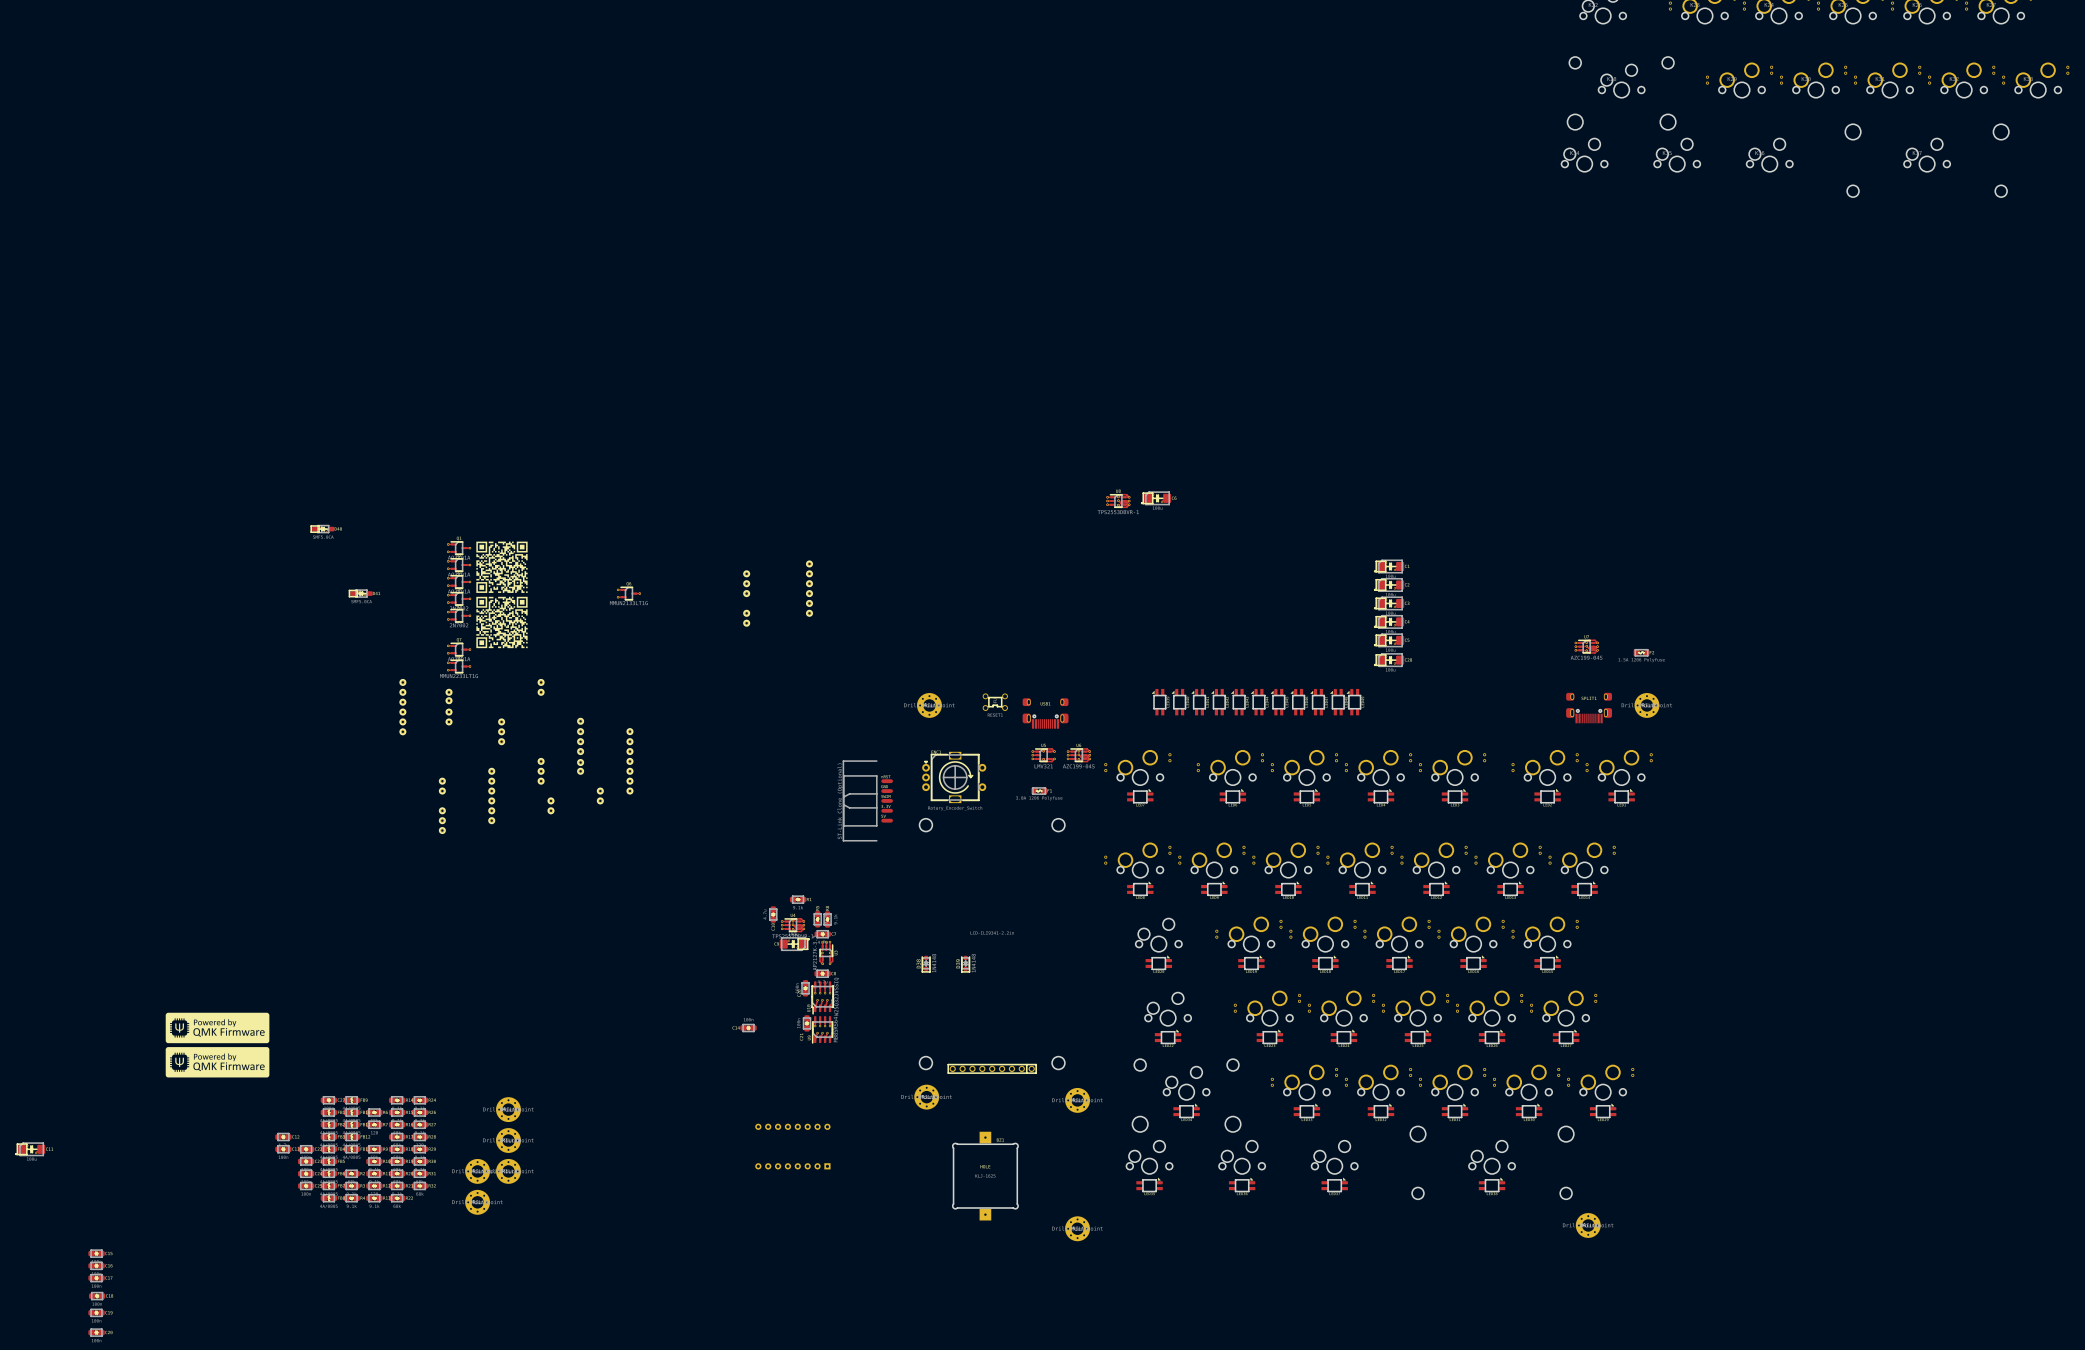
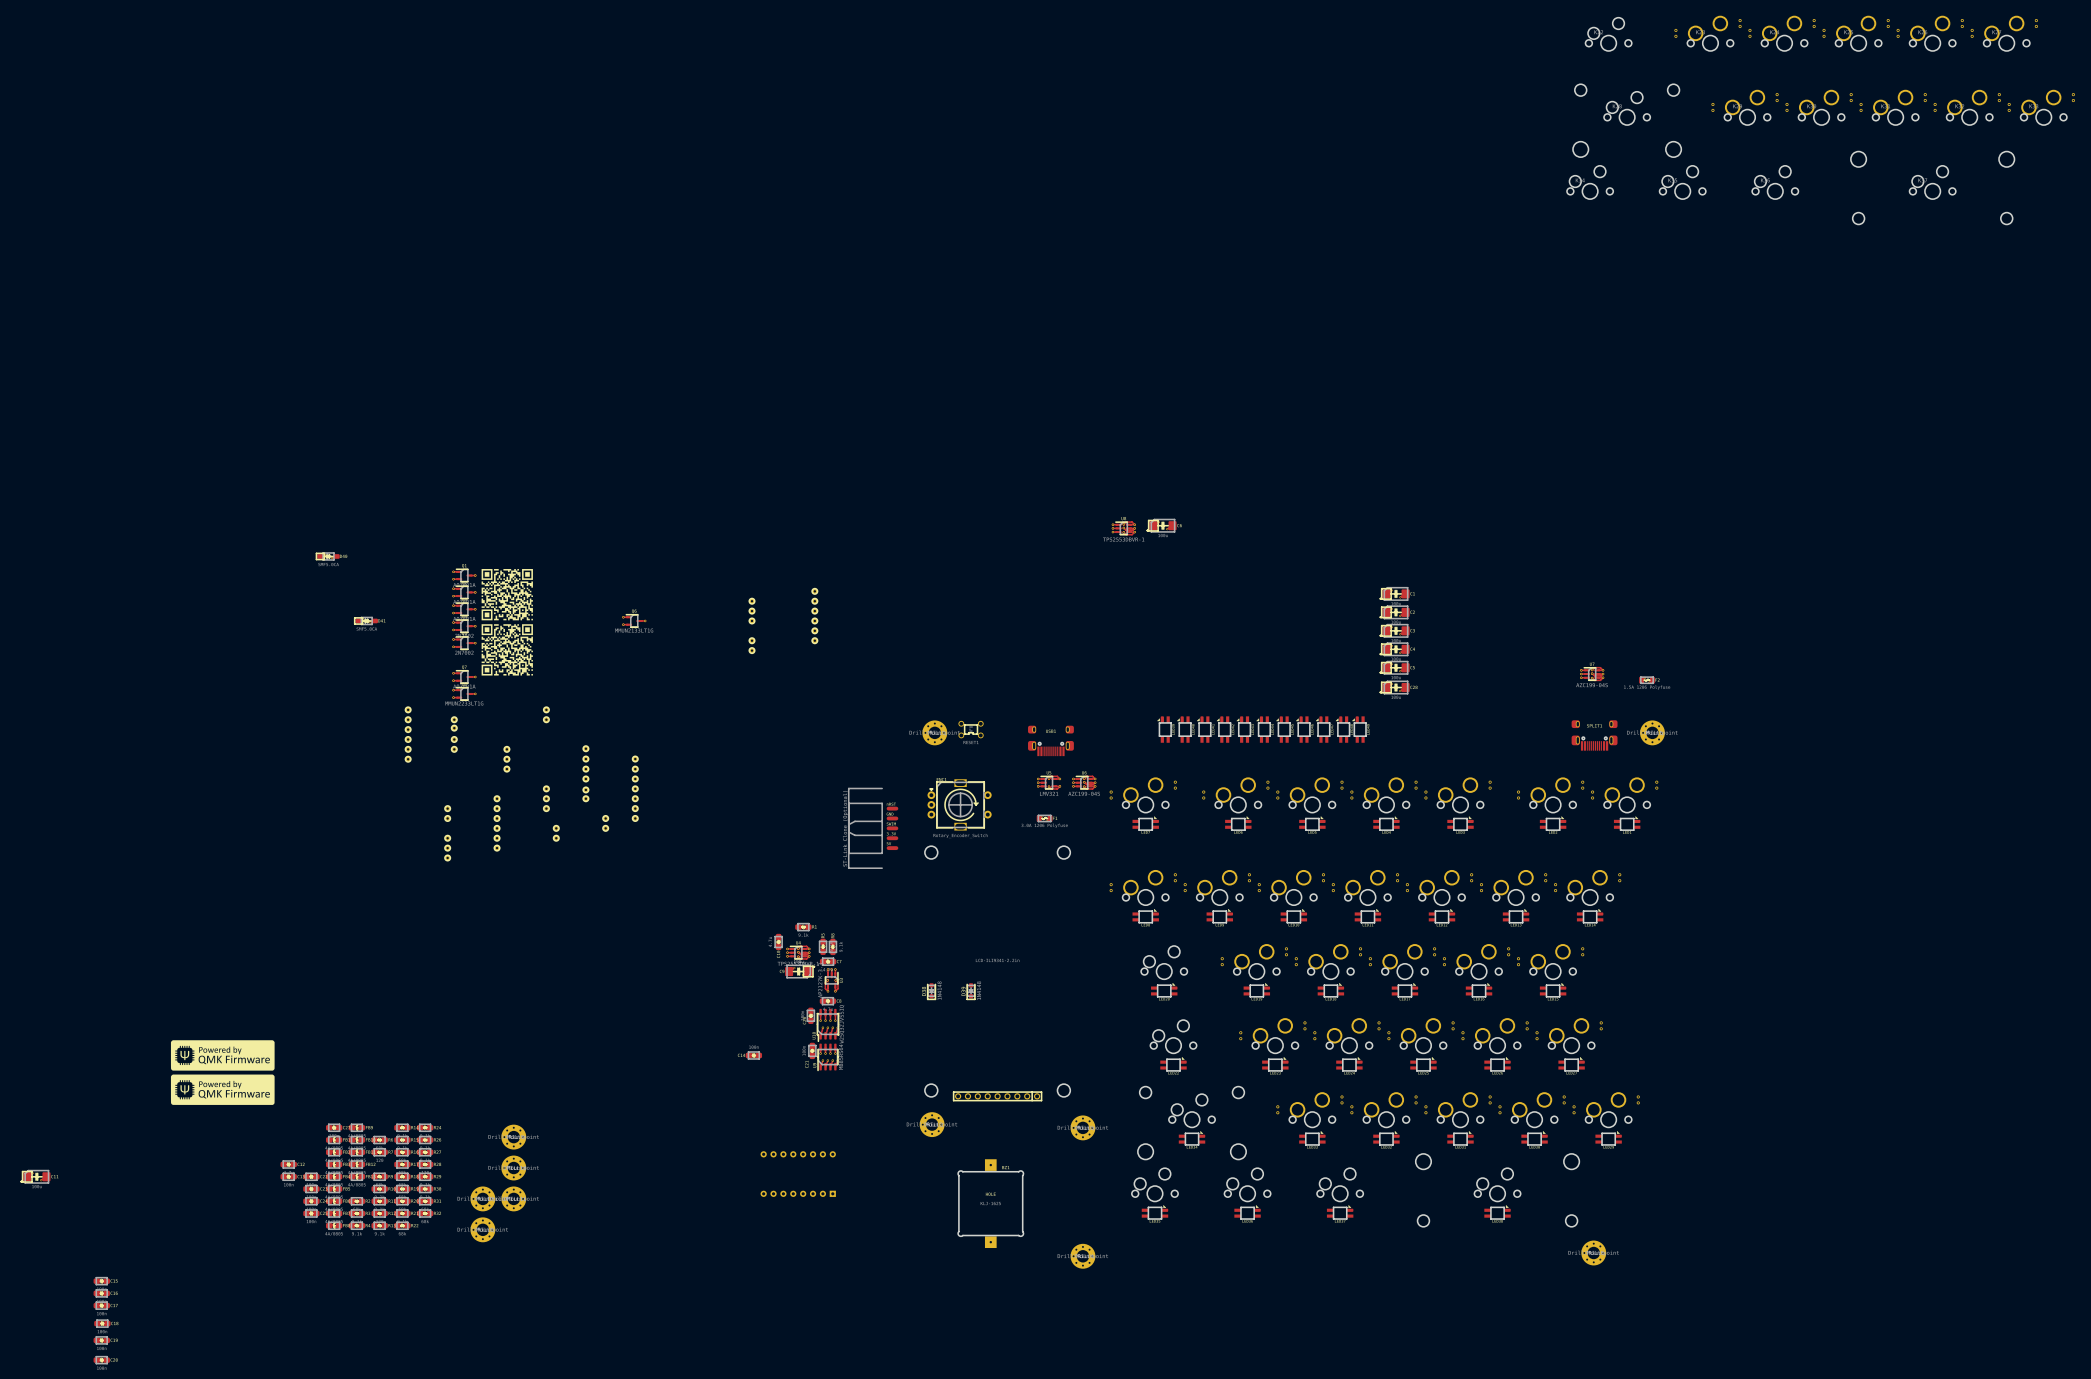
part position: (995, 702) -> (971, 729)

